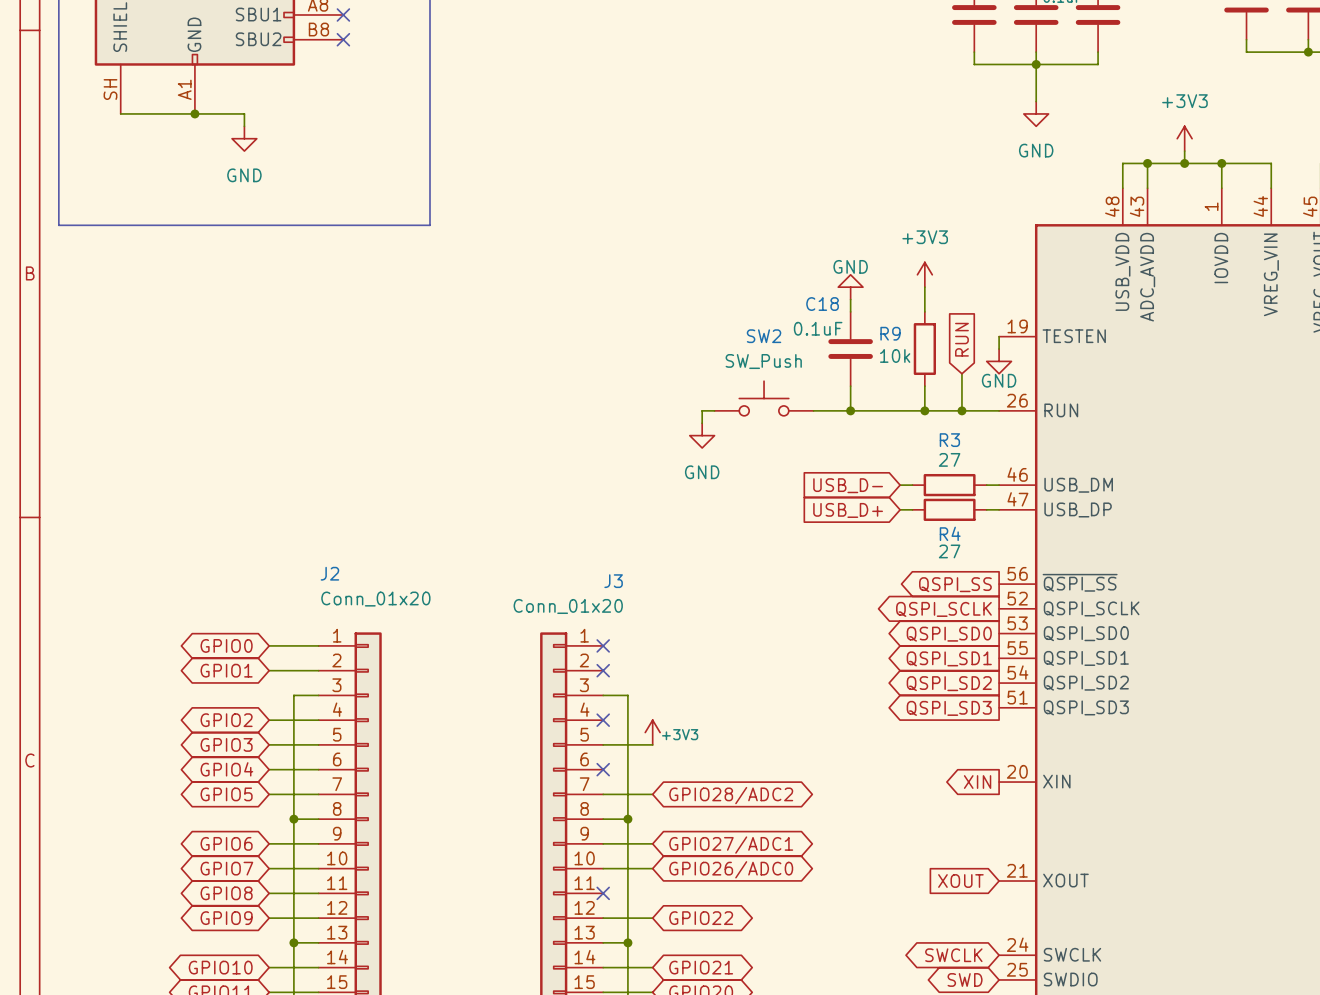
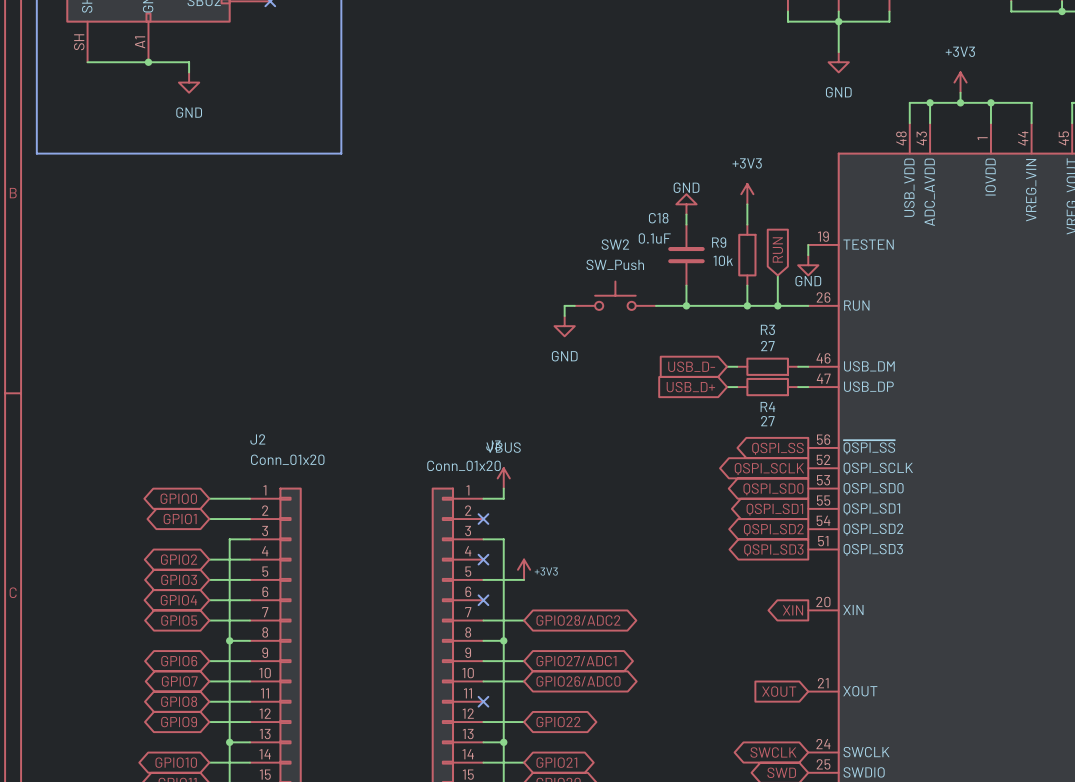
power symbol: none -> VBUS (503, 478)
wire: none -> (503, 488) (503, 498) (483, 498)
no-connect mark: (603, 645) -> none

